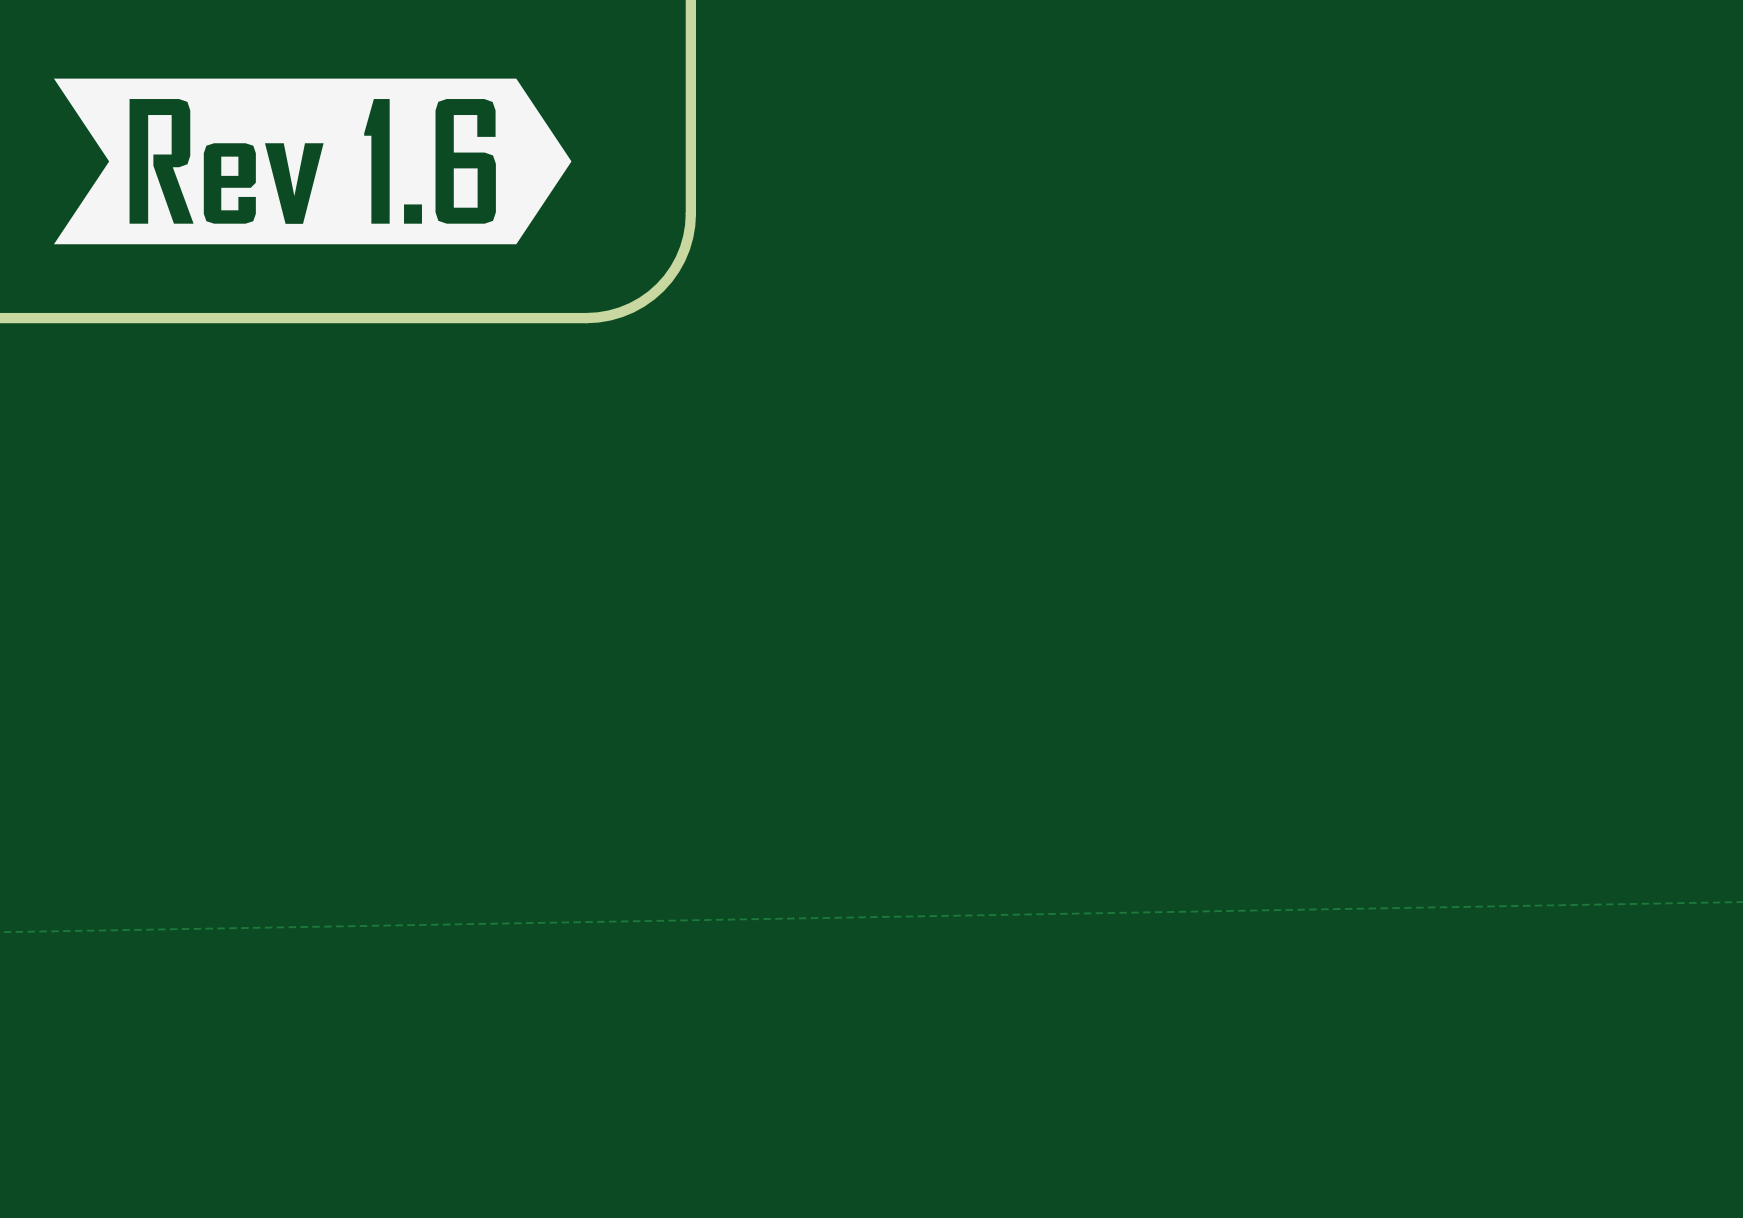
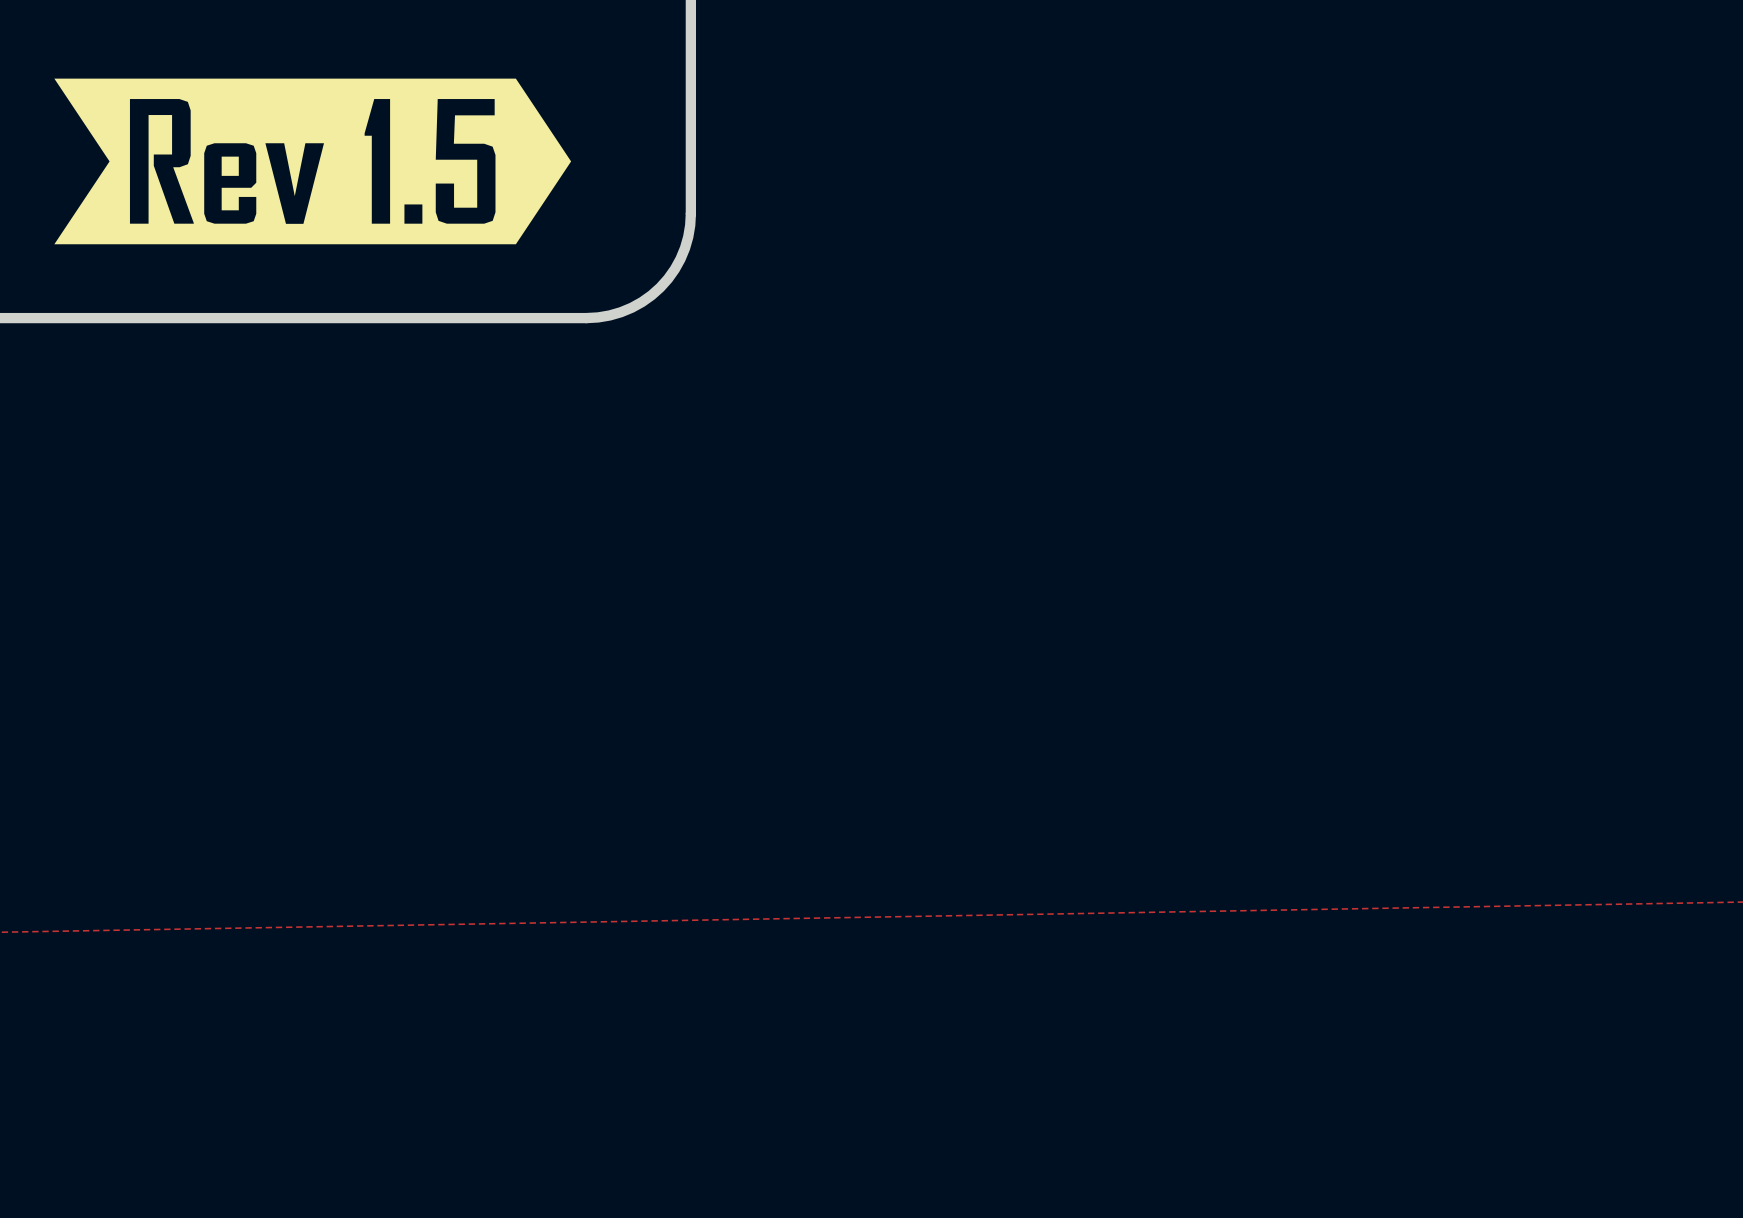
drawing shape: [53, 78, 572, 245] -> [54, 78, 572, 245]

